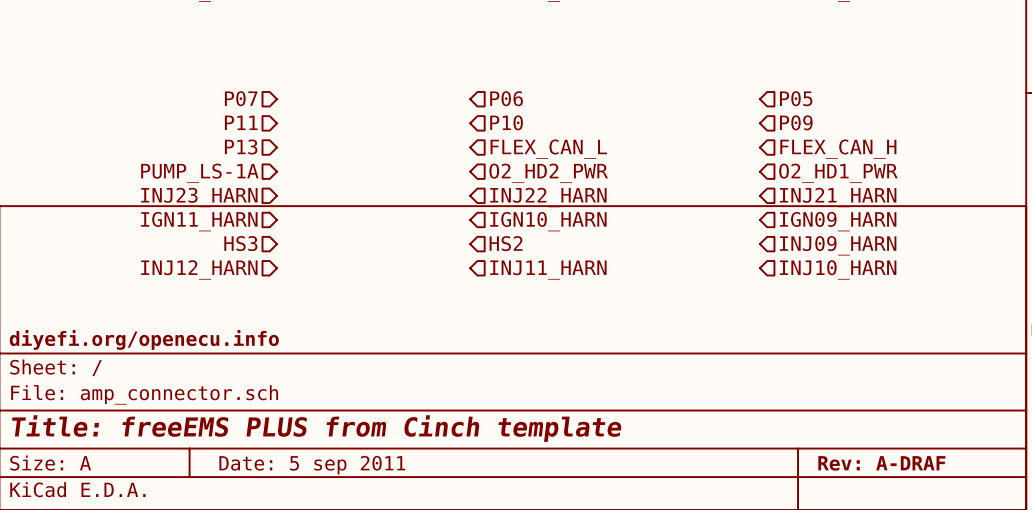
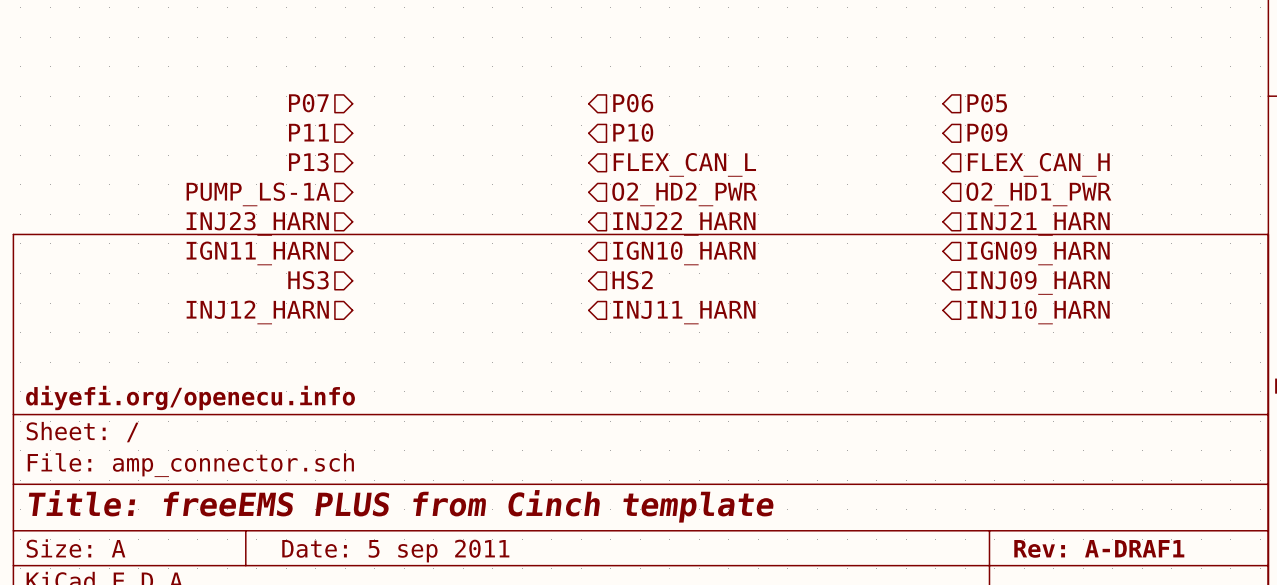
title block: Rev: A-DRAF (881, 463) -> Rev: A-DRAF1 (1099, 548)

